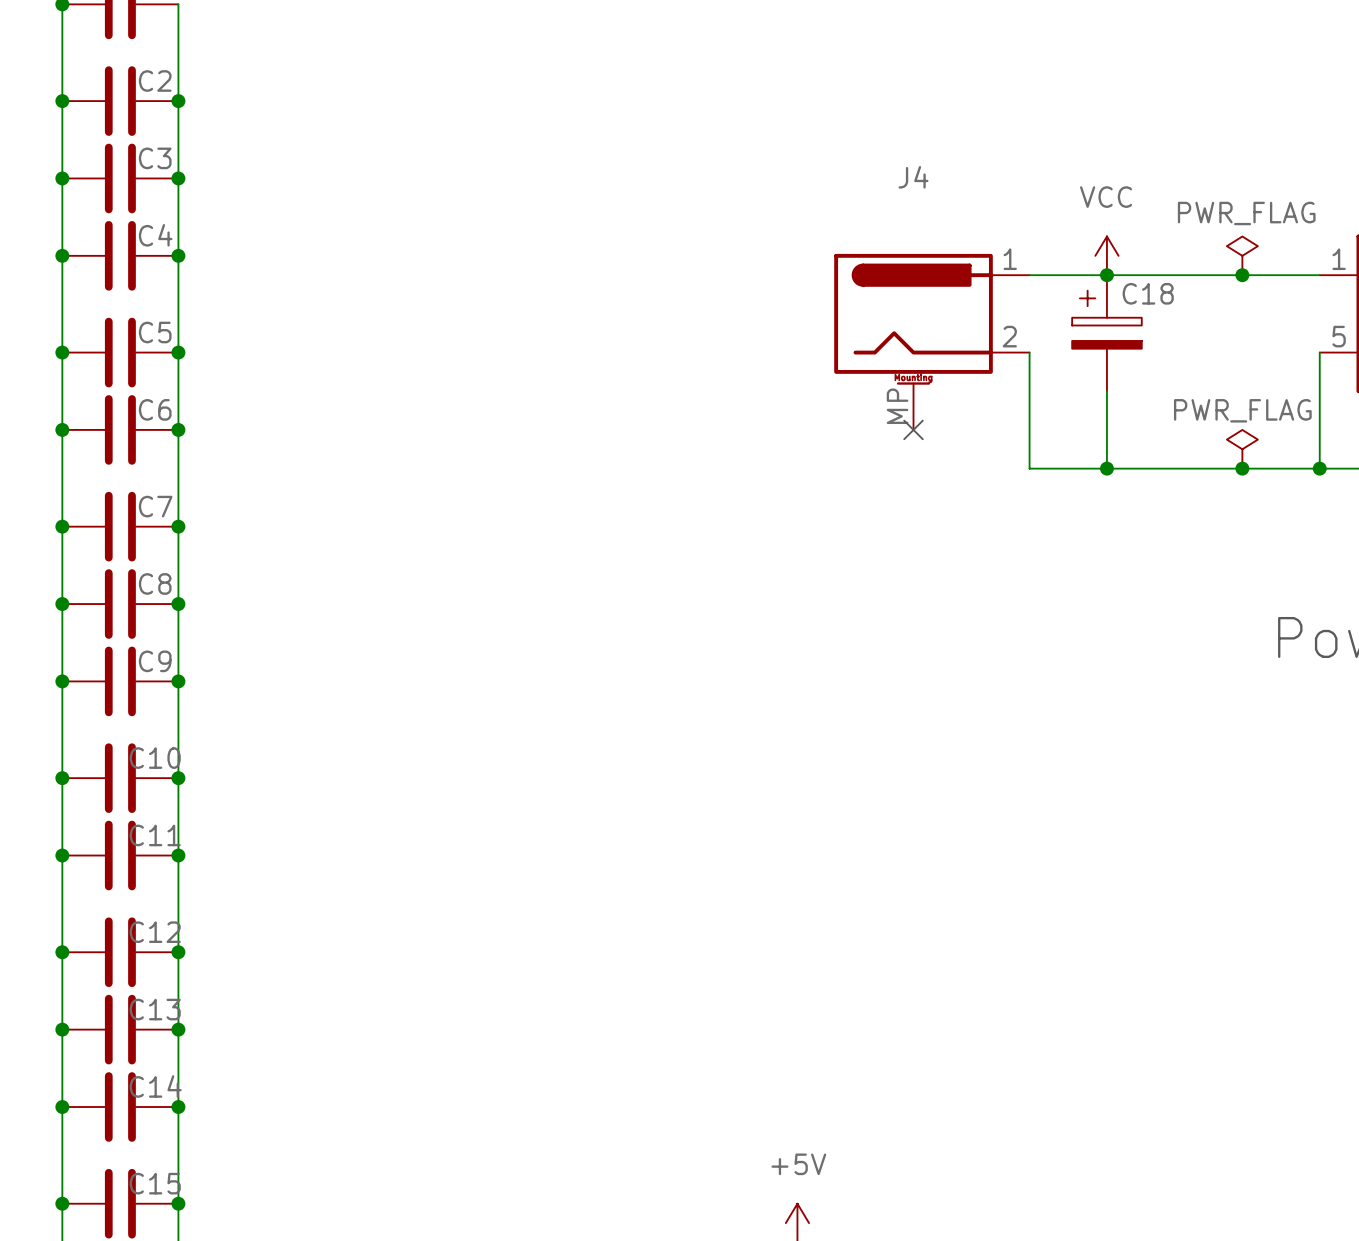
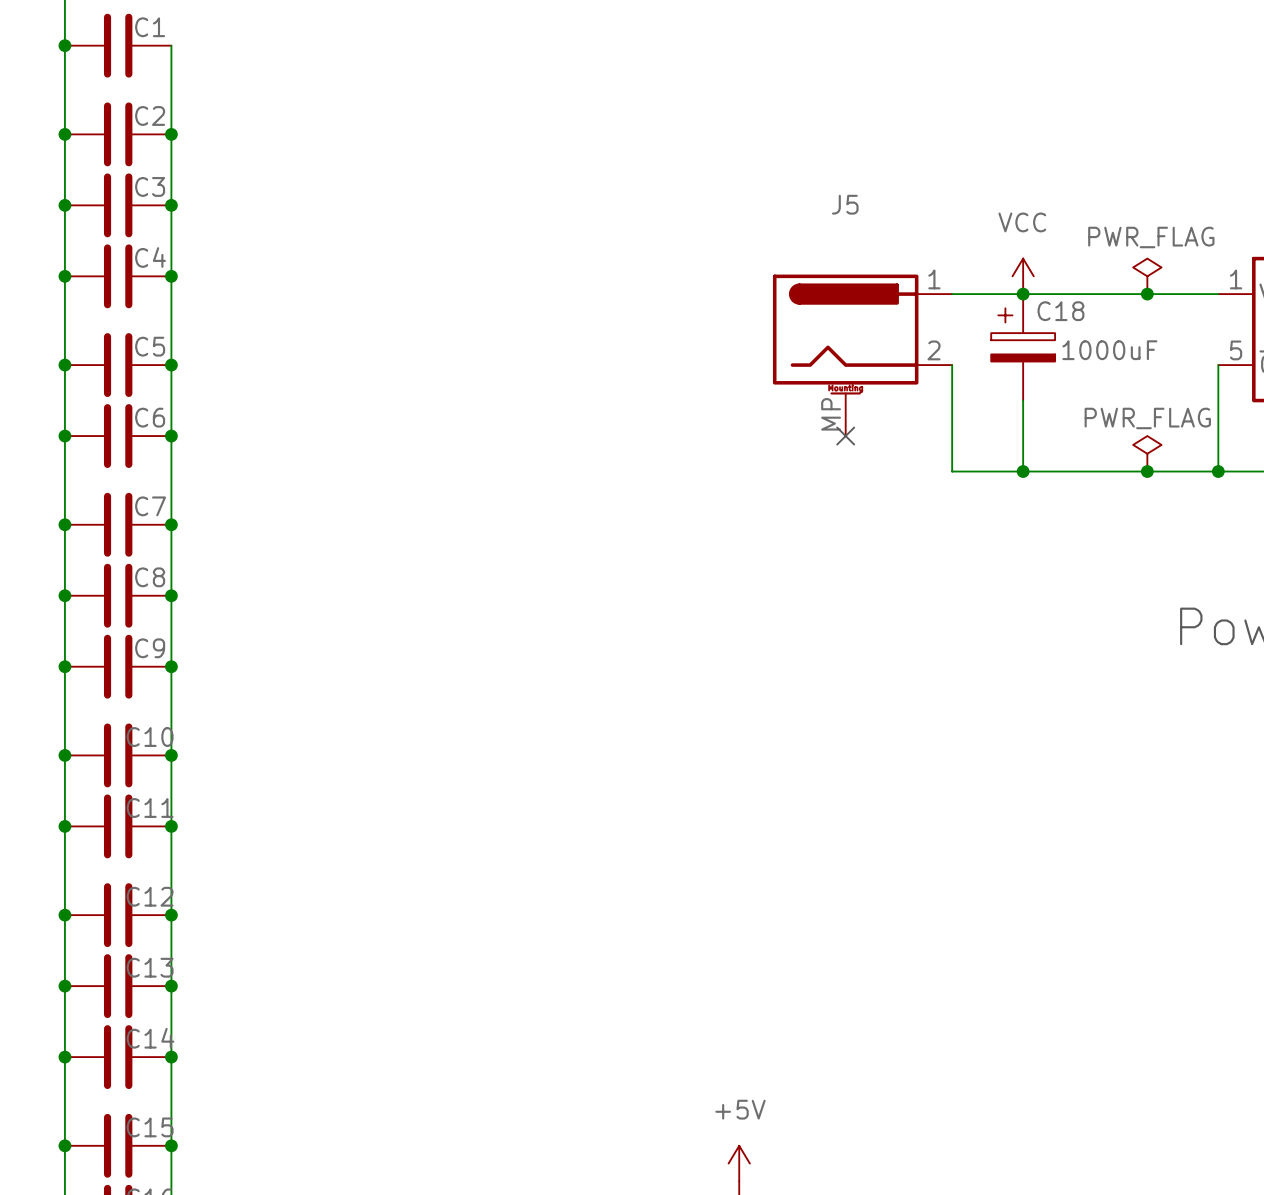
J4 name: J4 (913, 177) -> J5 (845, 204)
C18 value: none -> 1000uF (1109, 350)

